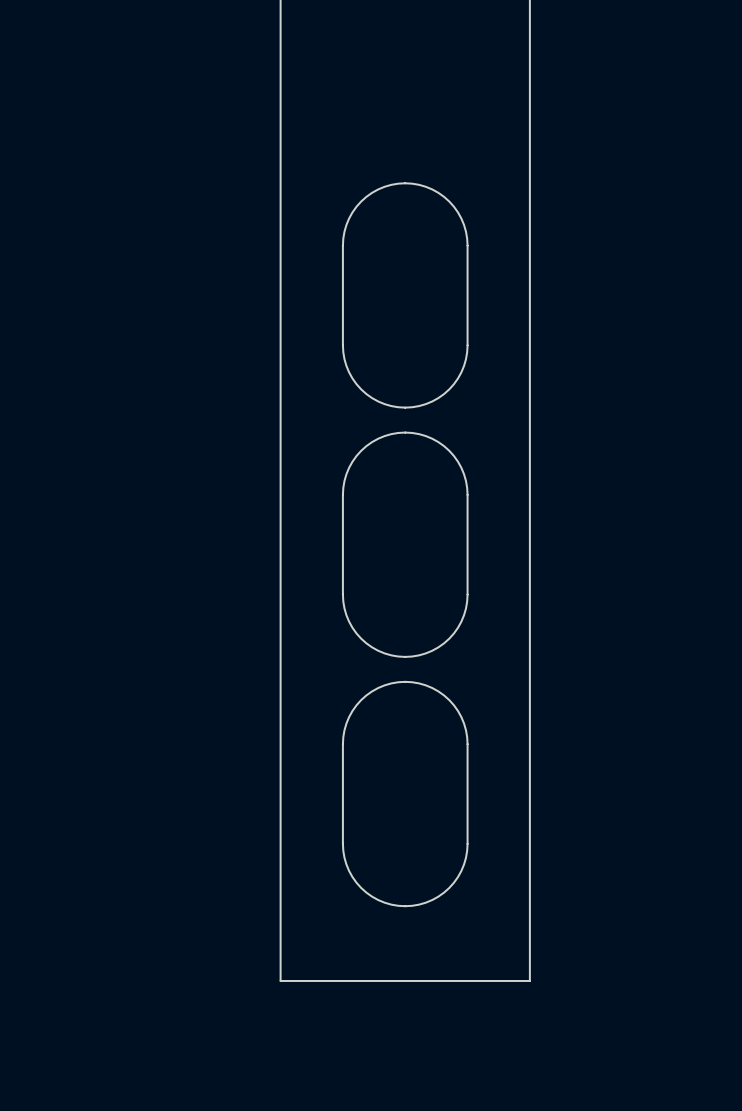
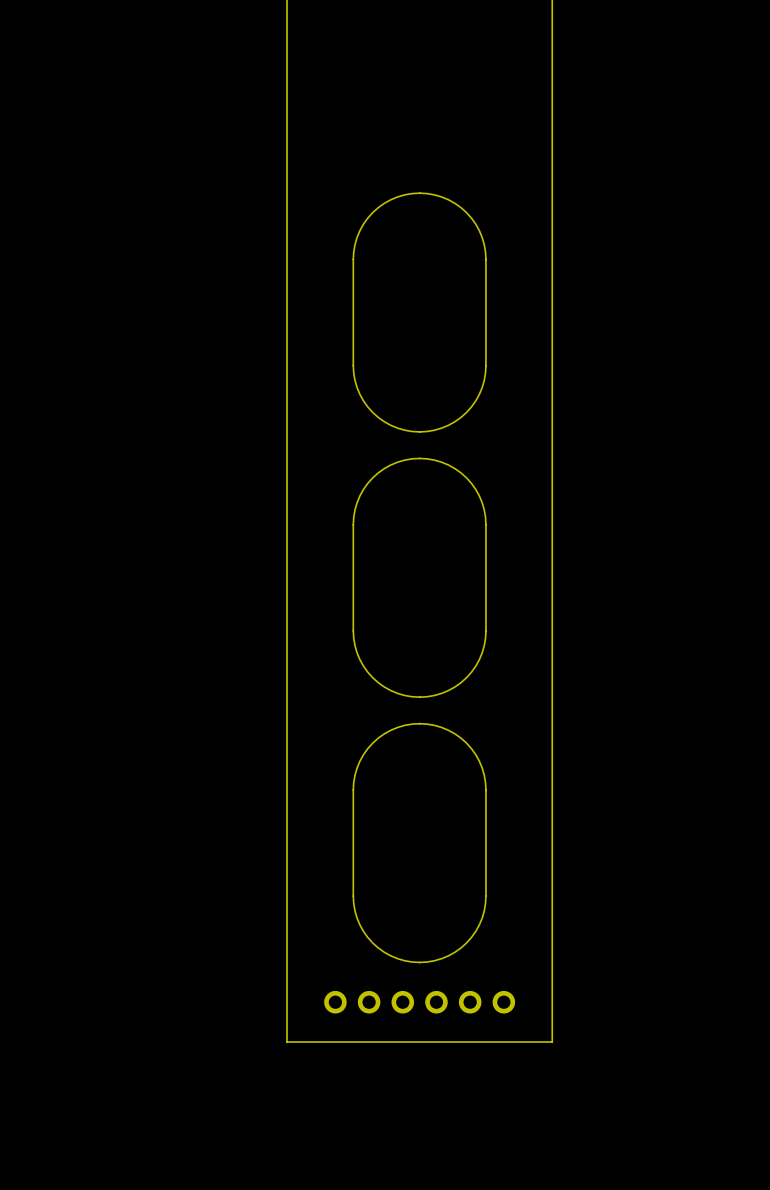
part: none -> (335, 1002)
part: none -> (369, 1002)
part: none -> (402, 1002)
part: none -> (436, 1002)
part: none -> (470, 1002)
part: none -> (503, 1002)

